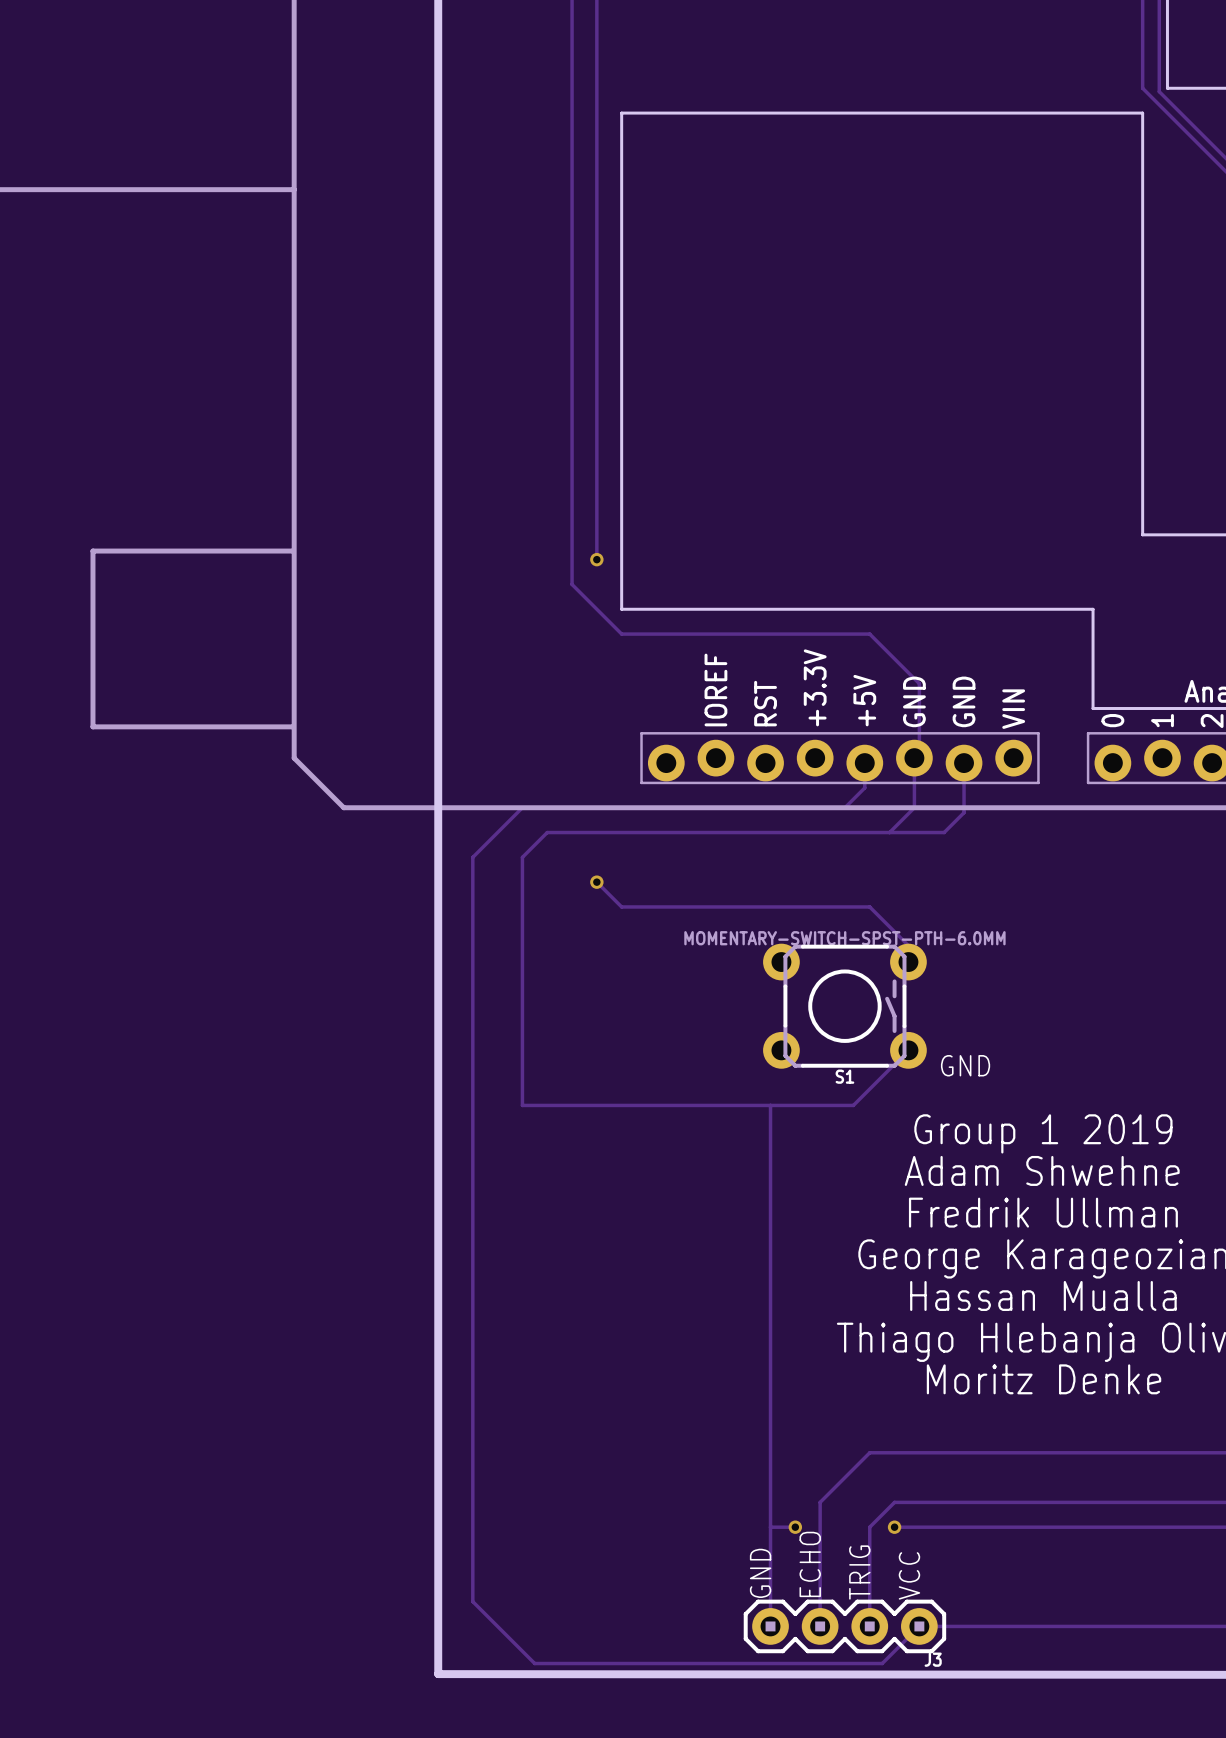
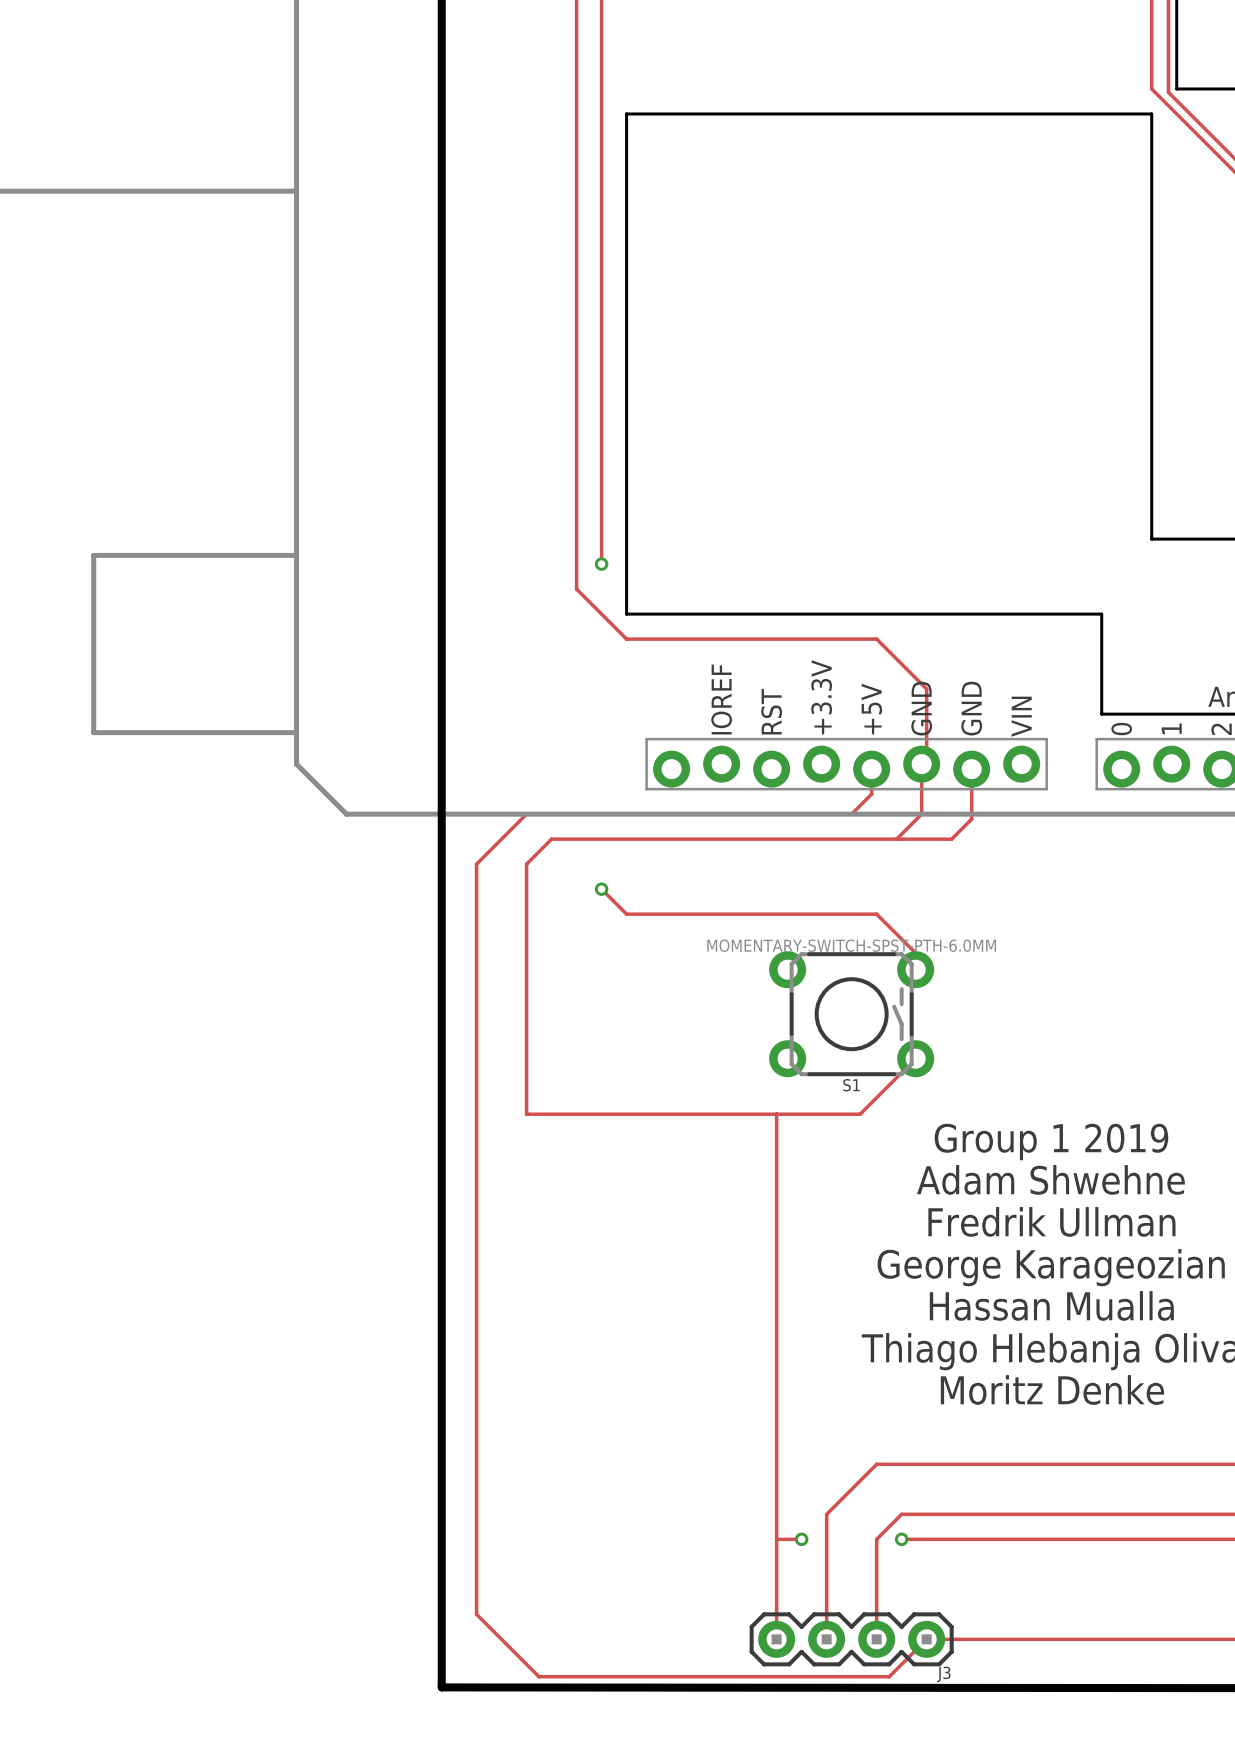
text: GND (965, 1065) -> none
text: ECHO (810, 1564) -> none
text: TRIG (859, 1572) -> none
text: GND (760, 1573) -> none
text: VCC (909, 1575) -> none

